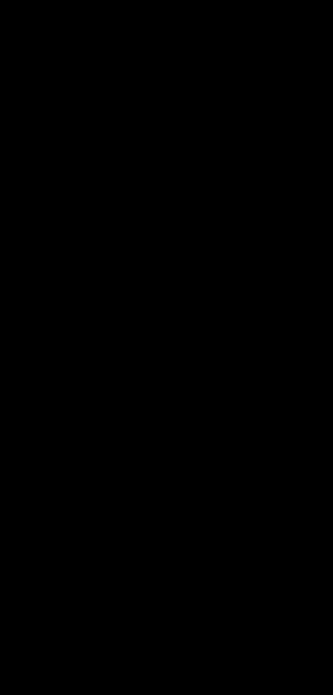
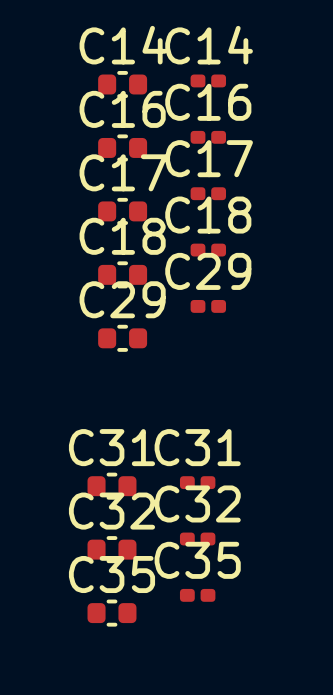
C14: none -> (208, 80)
C14: none -> (122, 84)
C16: none -> (208, 137)
C16: none -> (122, 147)
C17: none -> (208, 193)
C17: none -> (122, 211)
C18: none -> (208, 250)
C18: none -> (122, 274)
C29: none -> (208, 306)
C29: none -> (122, 338)
C31: none -> (197, 482)
C31: none -> (111, 486)
C32: none -> (197, 539)
C32: none -> (111, 549)
C35: none -> (197, 595)
C35: none -> (111, 613)

